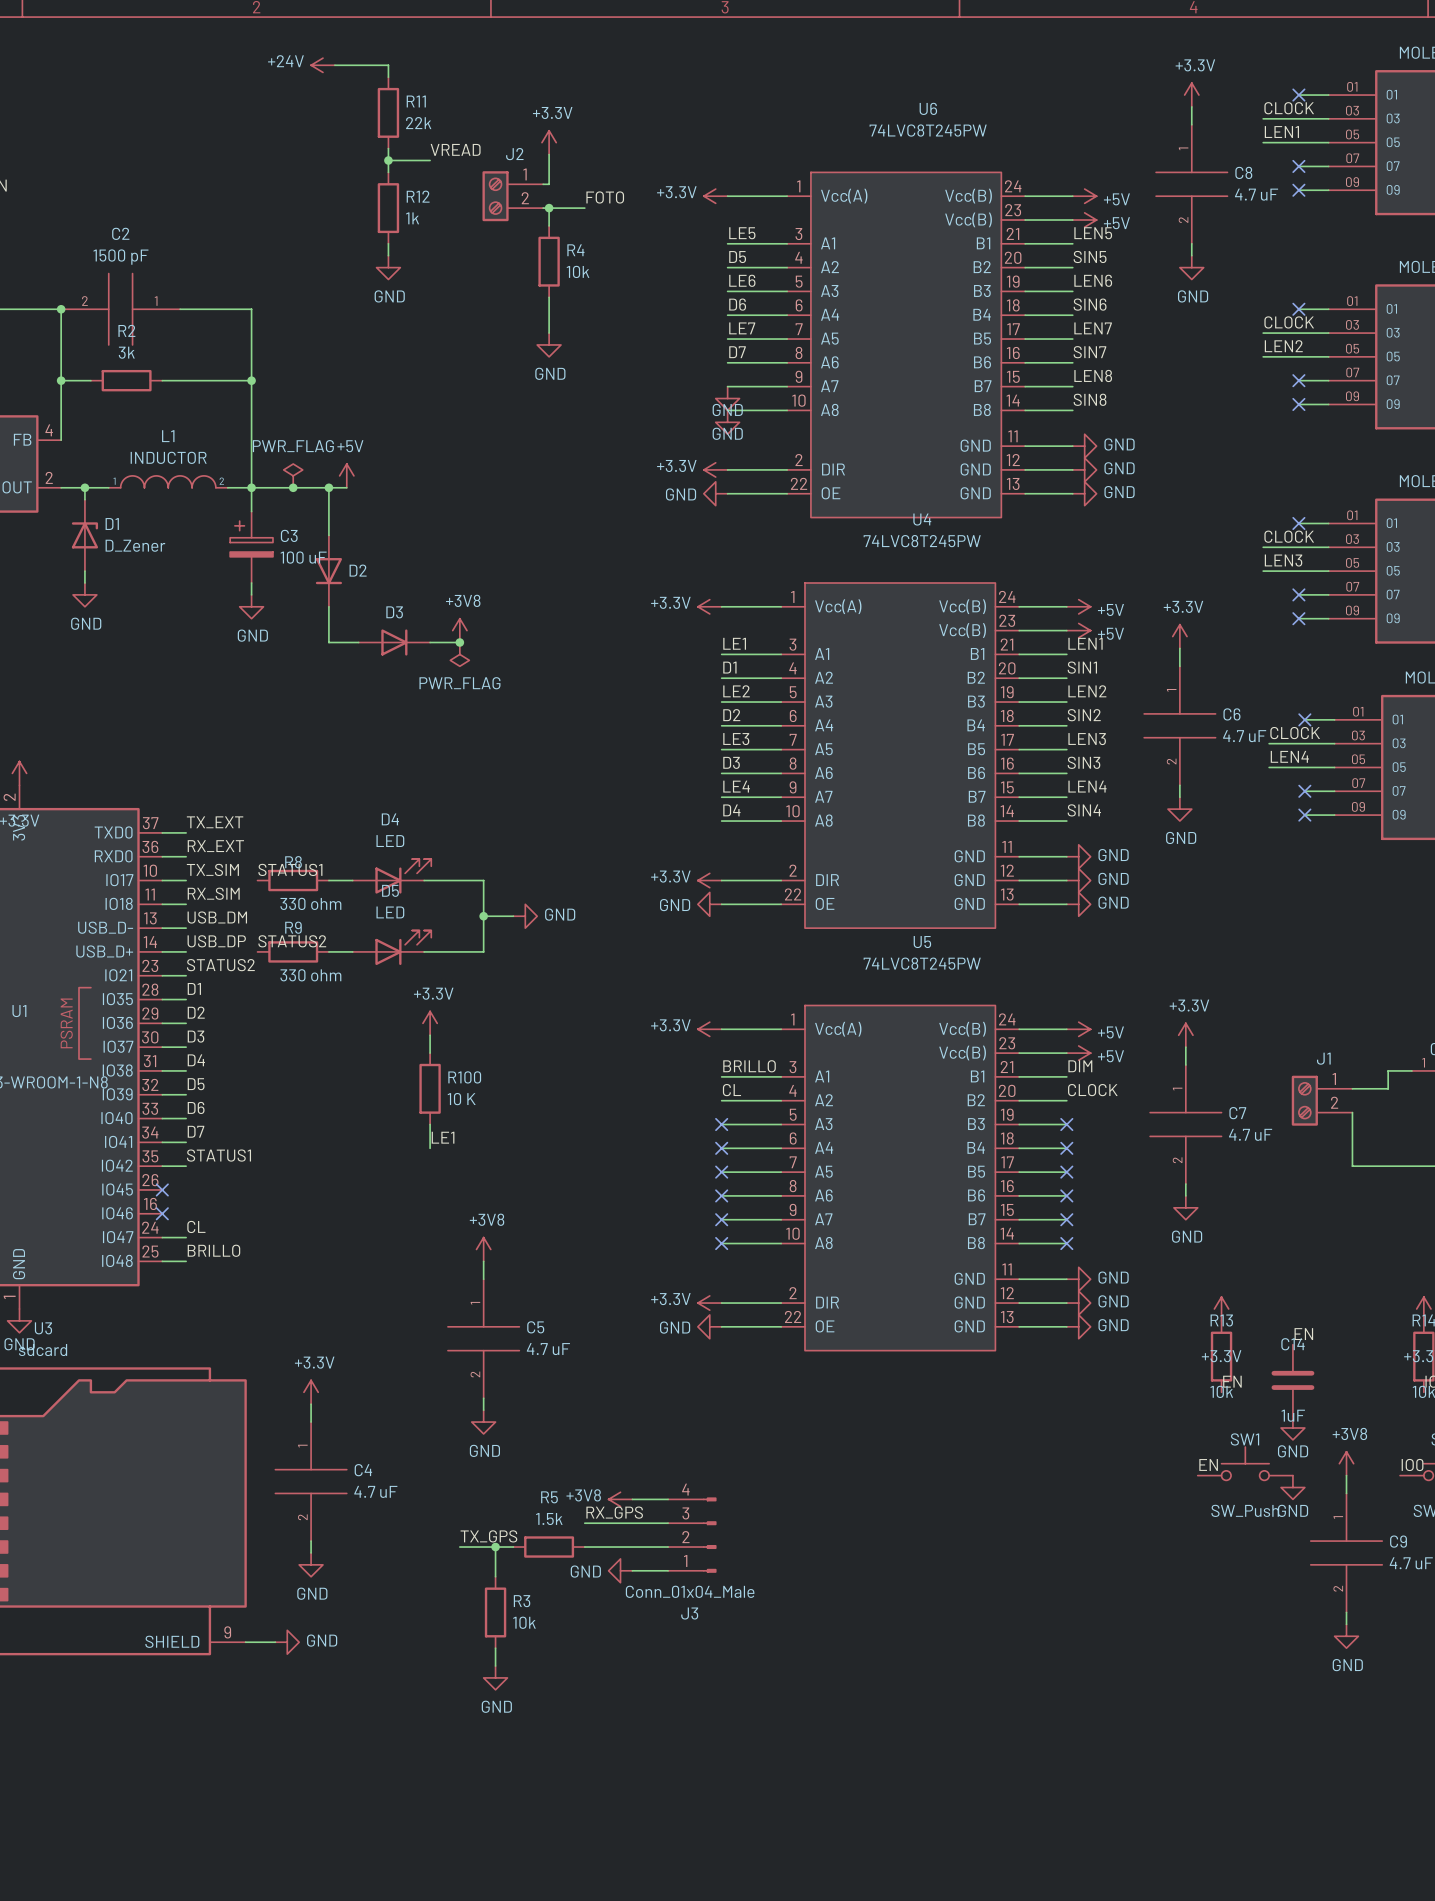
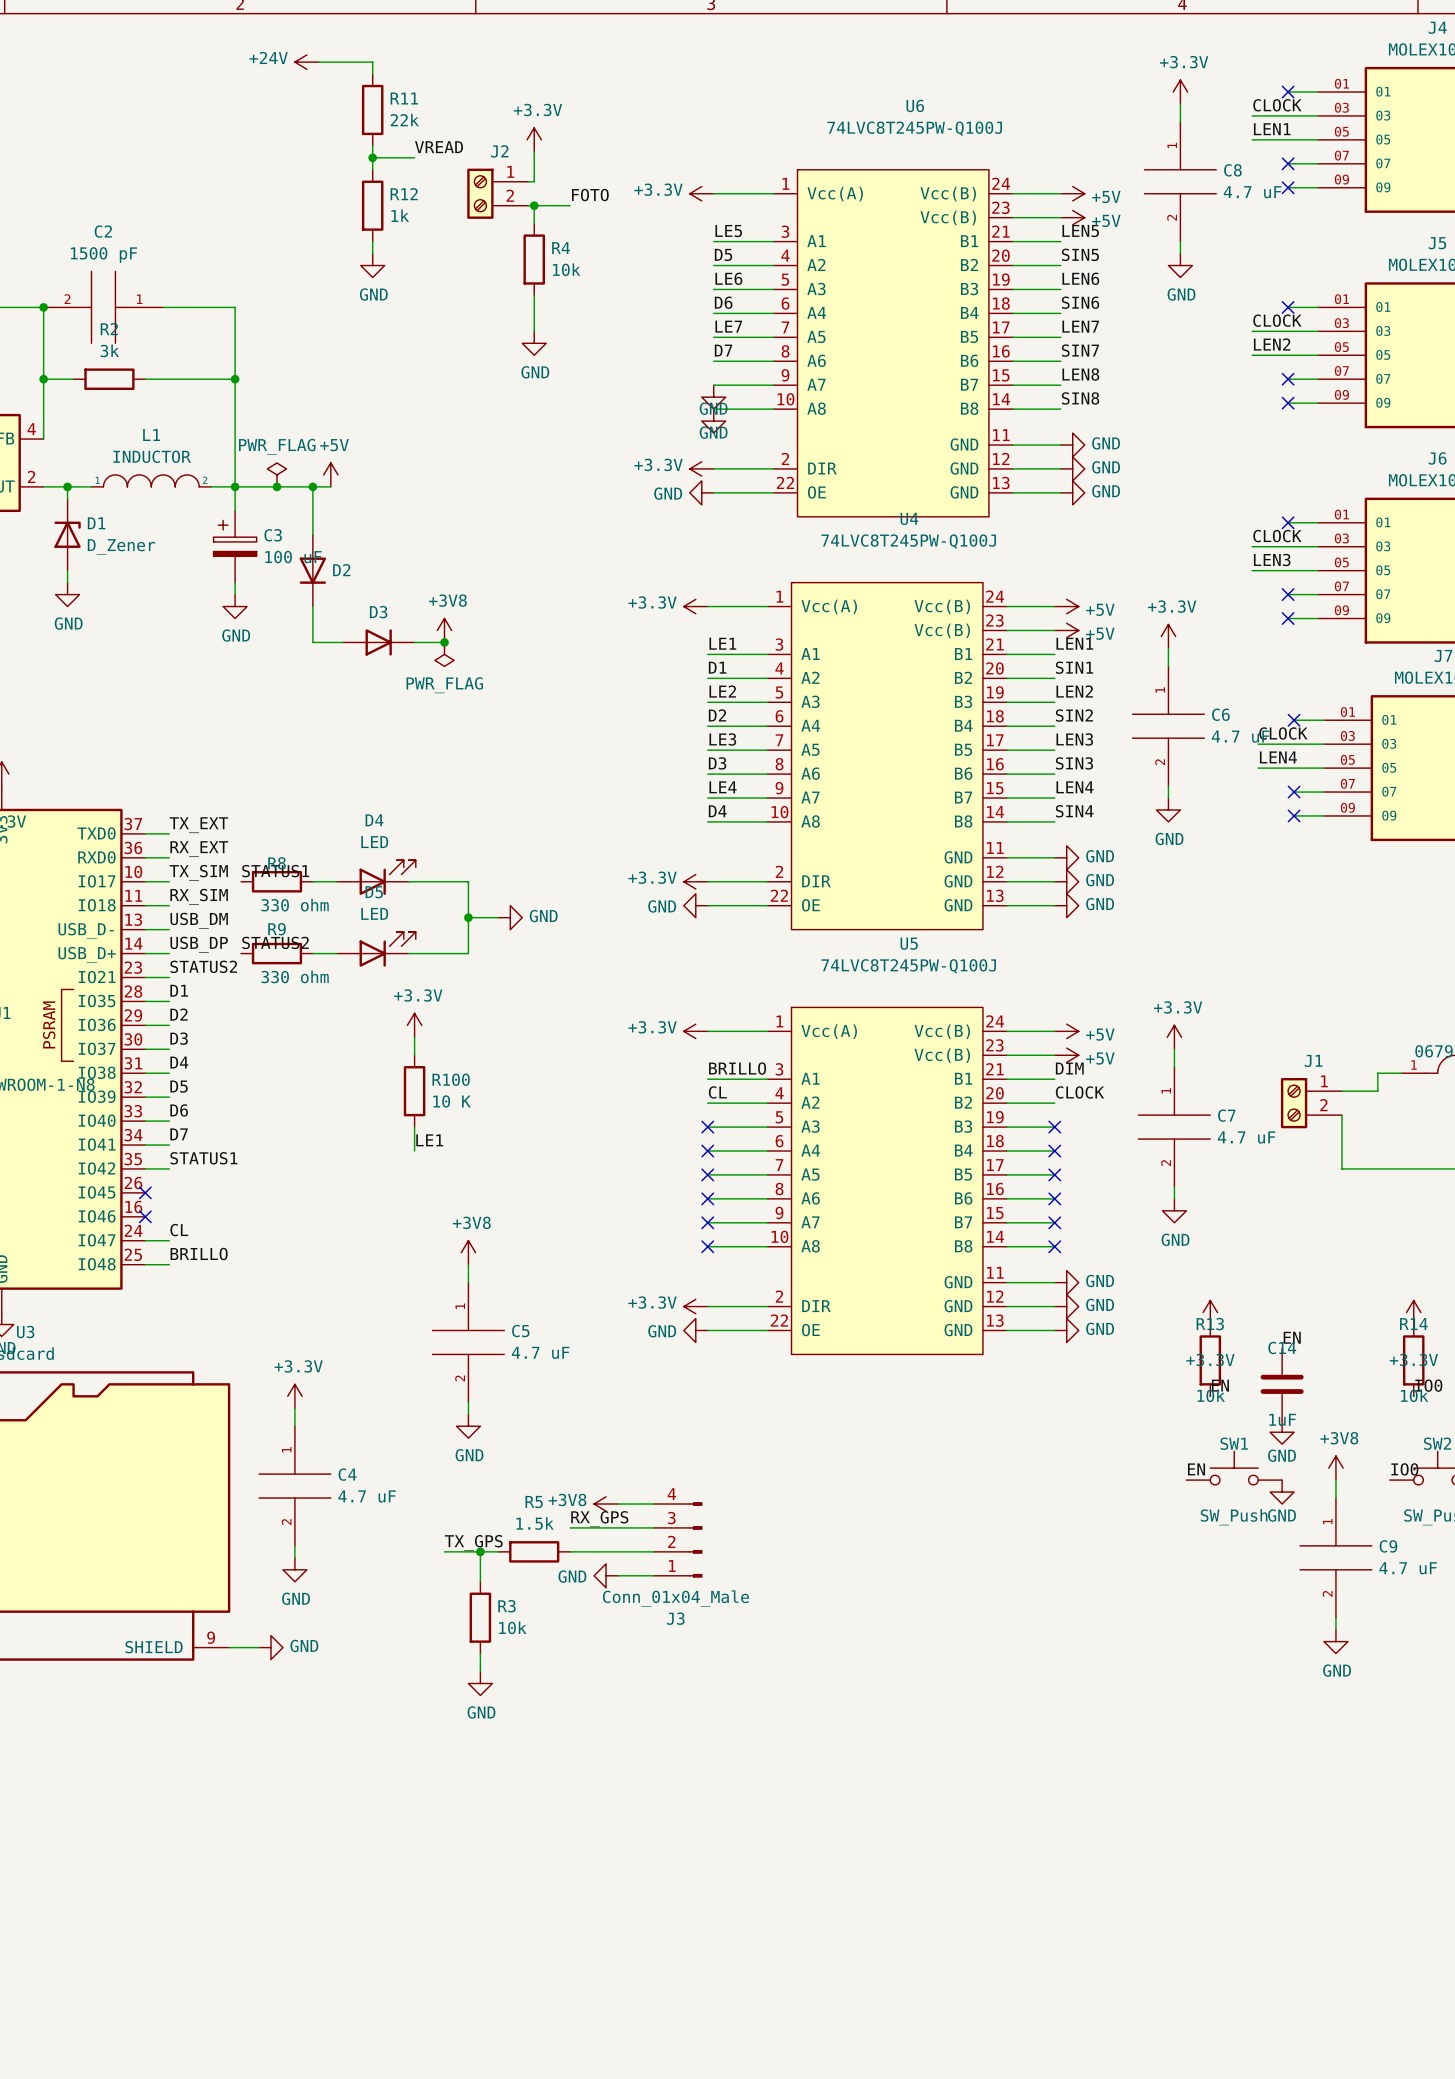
U6 value: 74LVC8T245PW (928, 130) -> 74LVC8T245PW-Q100J (914, 128)
U4 value: 74LVC8T245PW (922, 541) -> 74LVC8T245PW-Q100J (908, 541)
U5 value: 74LVC8T245PW (922, 963) -> 74LVC8T245PW-Q100J (908, 966)

